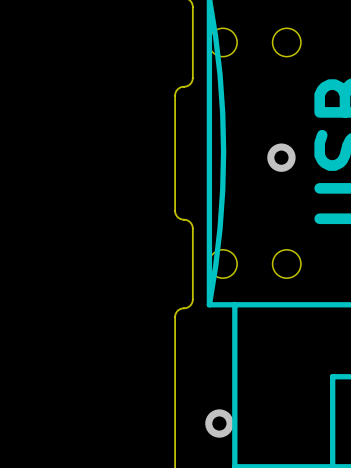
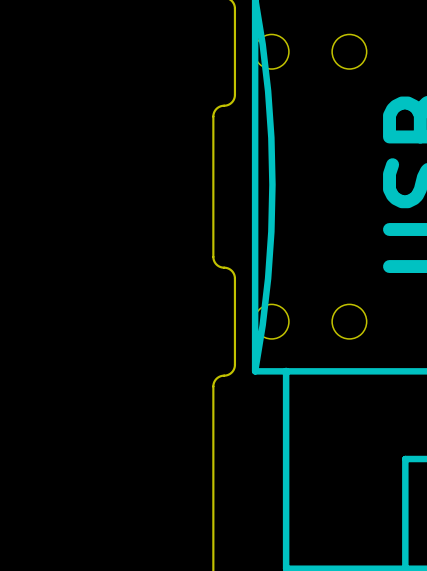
via: (281, 157) -> none
via: (219, 423) -> none

